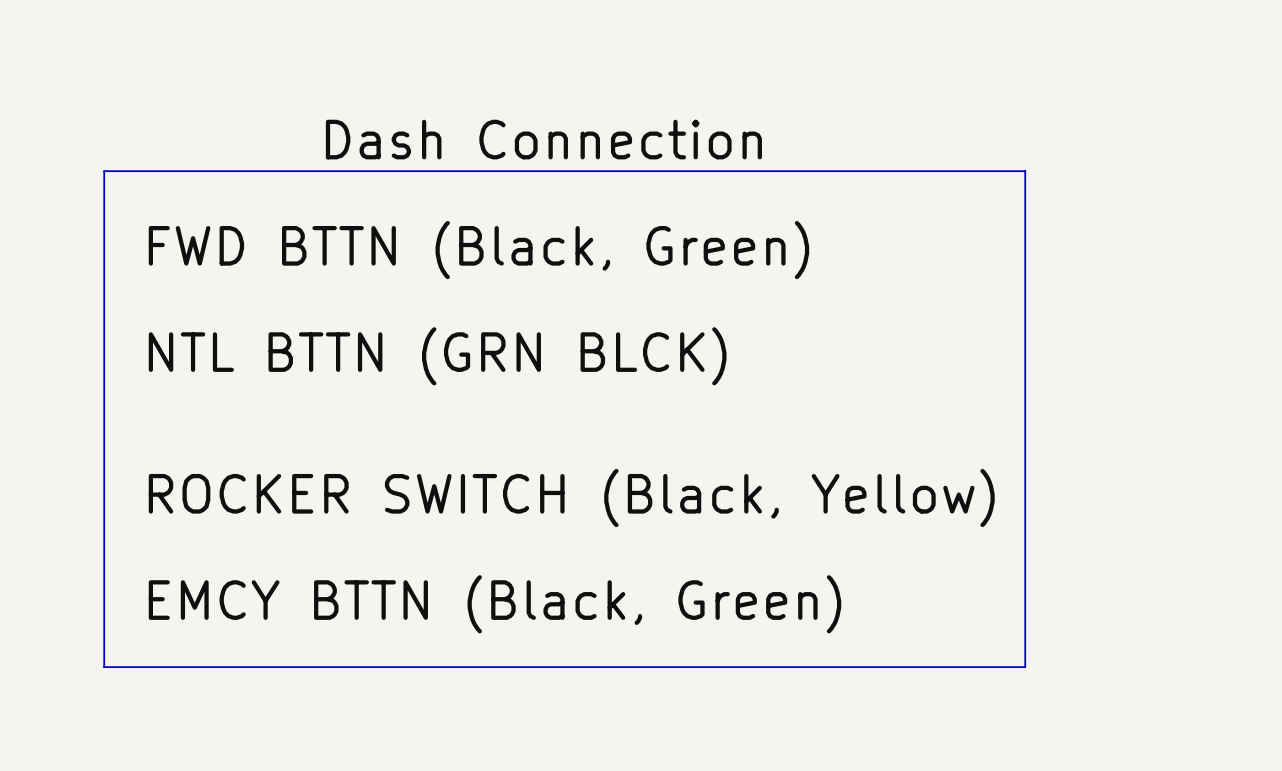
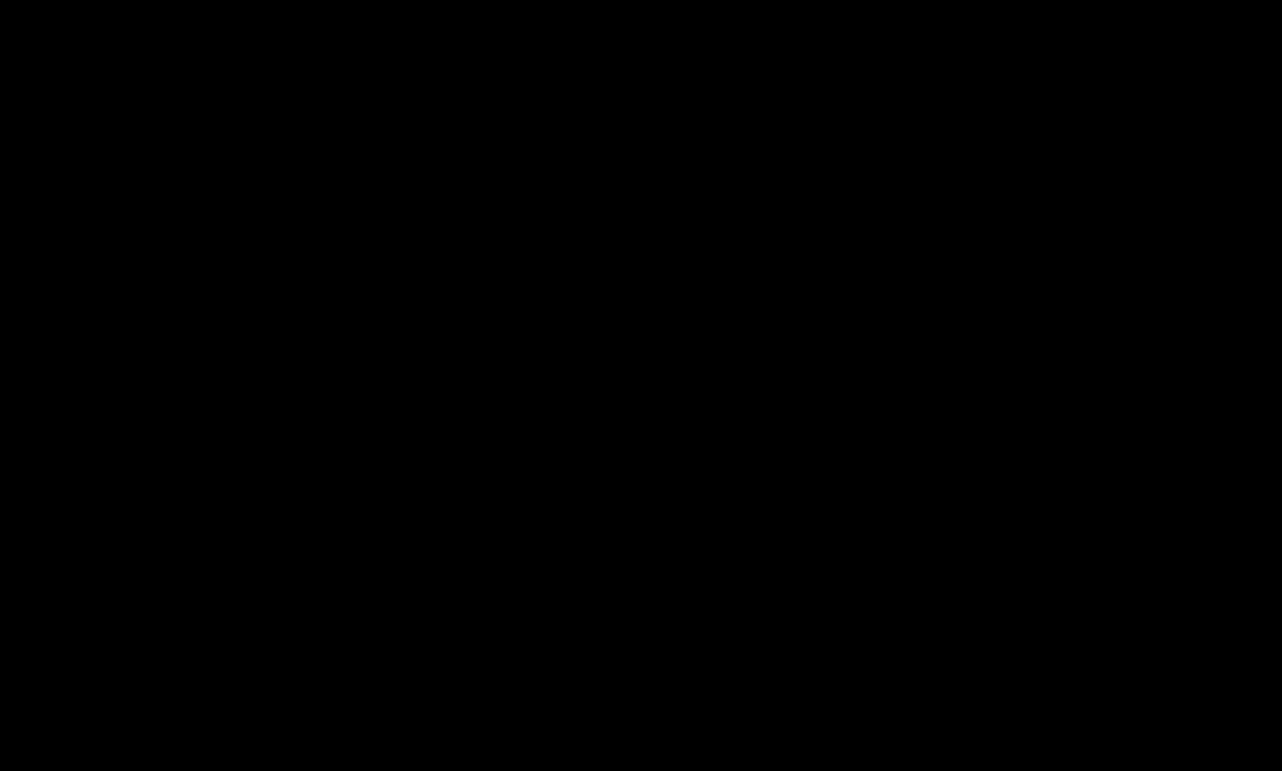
label: Dash Connection (543, 139) -> none
bus: (104, 171) (104, 667) (1025, 667) (1025, 171) (104, 171) -> none
label: FWD BTTN (Black, Green) (478, 250) -> none
label: NTL BTTN (GRN BLCK) (437, 356) -> none
label: ROCKER SWITCH (Black, Yellow) (571, 498) -> none
label: EMCY BTTN (Black, Green) (494, 604) -> none

